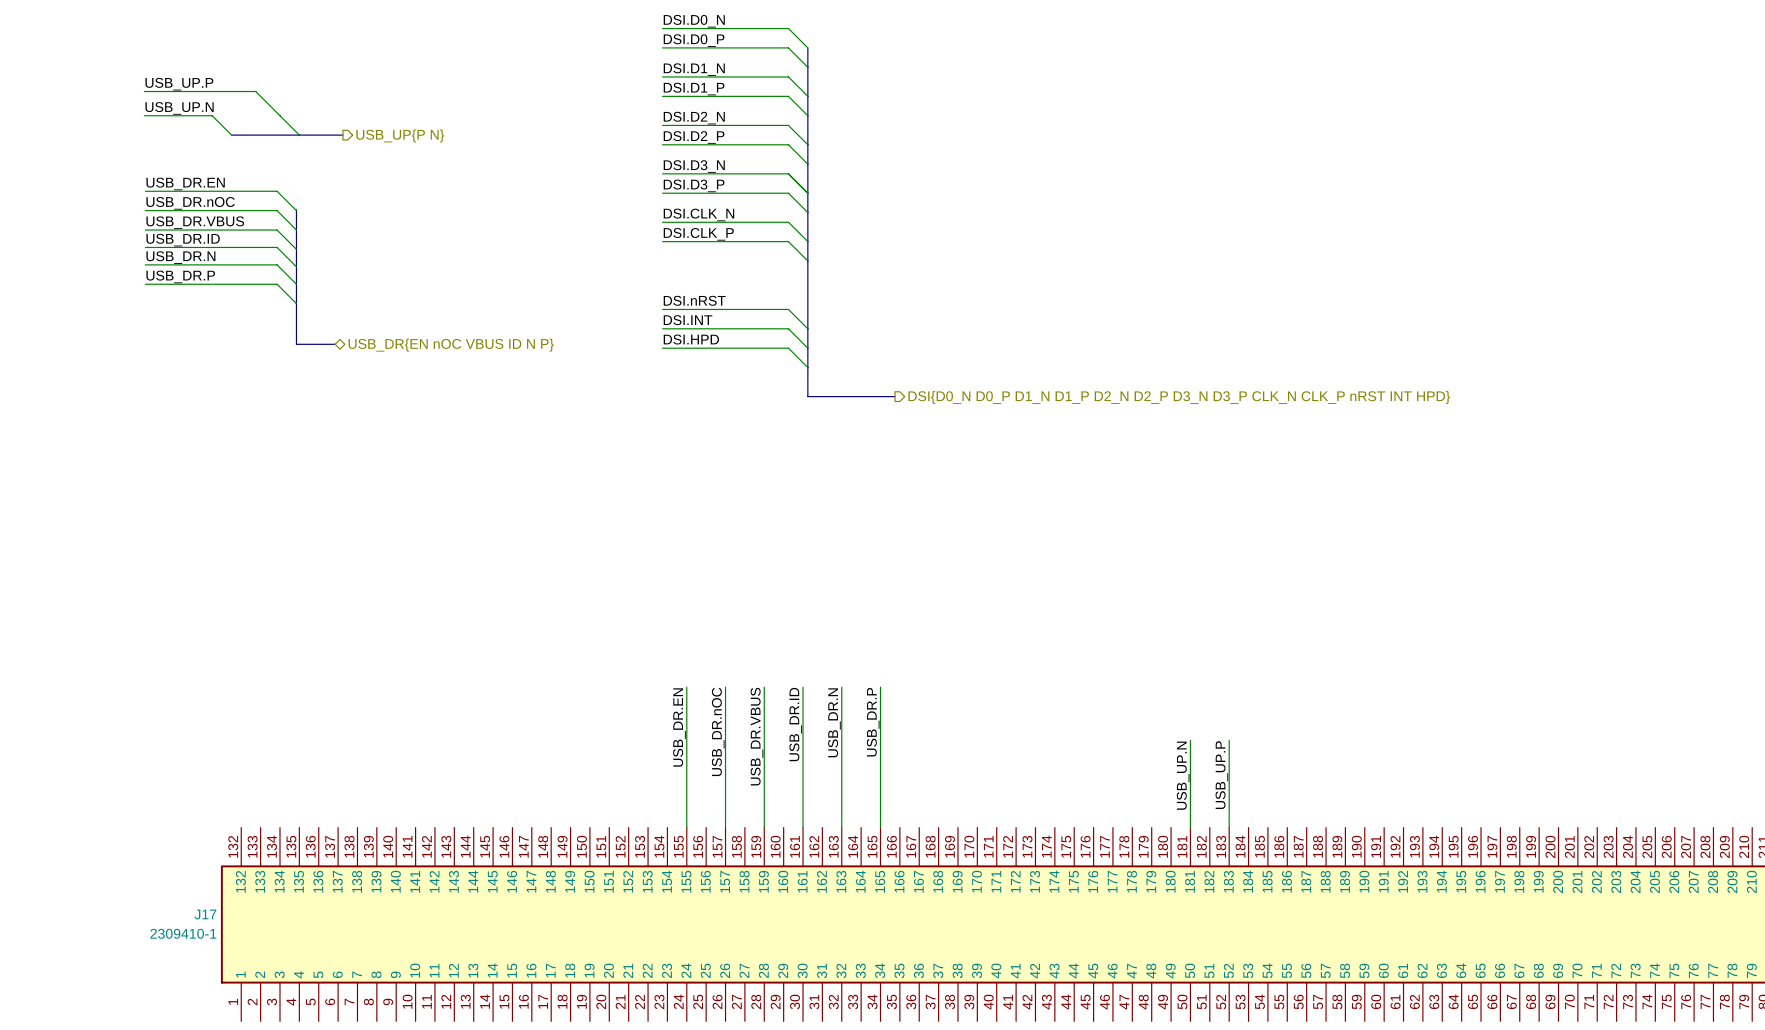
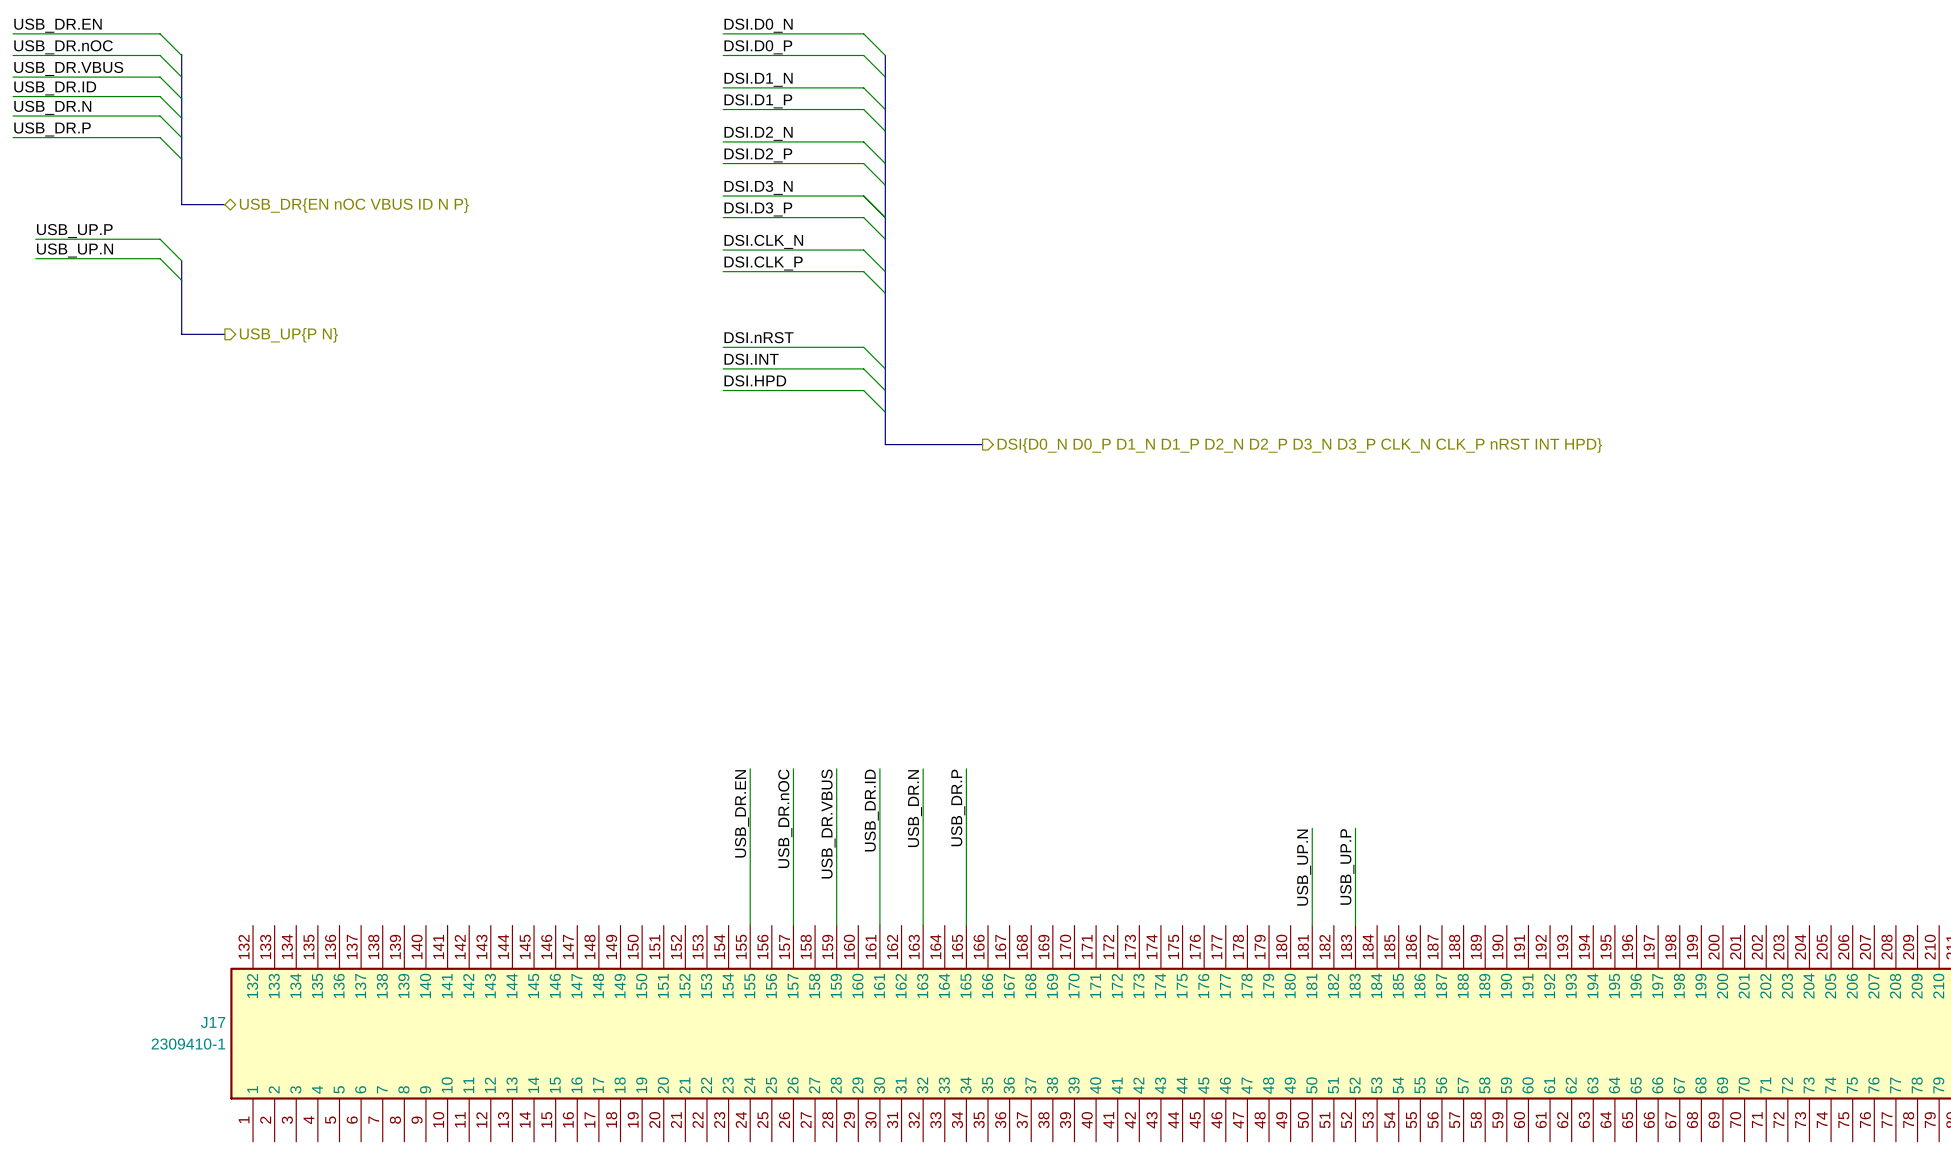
label: none -> USB_DR.EN (57, 25)
wire: none -> (13, 33) (160, 33) (181, 55)
label: none -> USB_DR.nOC (63, 47)
bus: none -> (181, 54) (181, 204) (224, 204)
label: none -> USB_DR.VBUS (68, 68)
label: none -> USB_DR.ID (55, 88)
wire: none -> (13, 96) (160, 96) (181, 118)
label position: USB_UP.P (179, 84) -> USB_UP.P (74, 231)
wire: (144, 91) (255, 91) (299, 135) -> none
label: none -> USB_DR.N (52, 107)
label position: USB_UP.N (179, 108) -> USB_UP.N (75, 250)
label: none -> USB_DR.P (52, 129)
wire: (144, 115) (212, 115) (231, 135) -> none
bus: (231, 135) (342, 135) -> none
hierarchical label: USB_UP{P N} (400, 135) -> none
hierarchical label: none -> USB_DR{EN nOC VBUS ID N P} (354, 205)
label: USB_DR.EN (185, 183) -> none
wire: (145, 191) (277, 191) (296, 210) -> (13, 55) (160, 55) (181, 77)
label: USB_DR.nOC (190, 203) -> none
bus: (296, 209) (296, 344) (335, 344) -> none
wire: (145, 210) (277, 210) (296, 230) -> (13, 77) (160, 77) (181, 98)
wire: none -> (35, 239) (160, 239) (181, 260)
label: USB_DR.VBUS (195, 222) -> none
wire: none -> (35, 258) (146, 258)
wire: (157, 230) (277, 230) (296, 249) -> (160, 258) (181, 280)
bus: none -> (181, 260) (181, 334) (224, 334)
label: USB_DR.ID (183, 240) -> none
wire: (145, 247) (277, 247) (296, 266) -> (13, 116) (160, 116) (181, 137)
label: USB_DR.N (180, 257) -> none
wire: (145, 264) (277, 264) (296, 284) -> (13, 137) (160, 137) (181, 159)
label: USB_DR.P (180, 276) -> none
wire: (145, 284) (277, 284) (296, 303) -> none
hierarchical label: none -> USB_UP{P N} (288, 335)
hierarchical label: USB_DR{EN nOC VBUS ID N P} (451, 345) -> none

